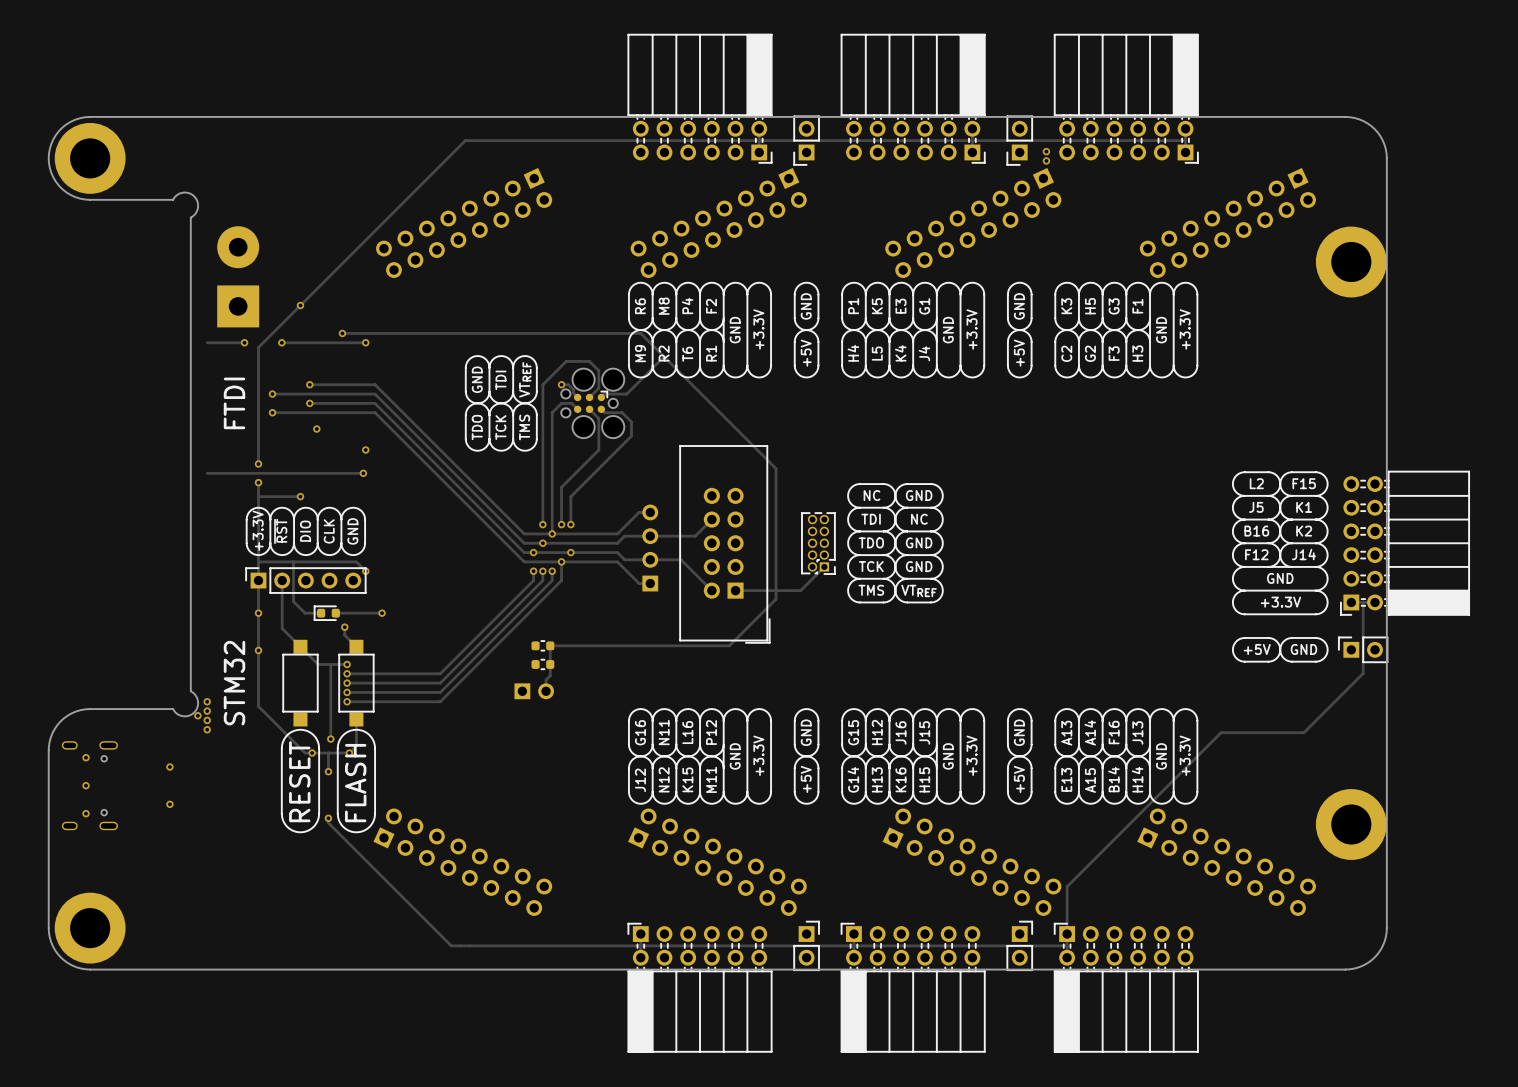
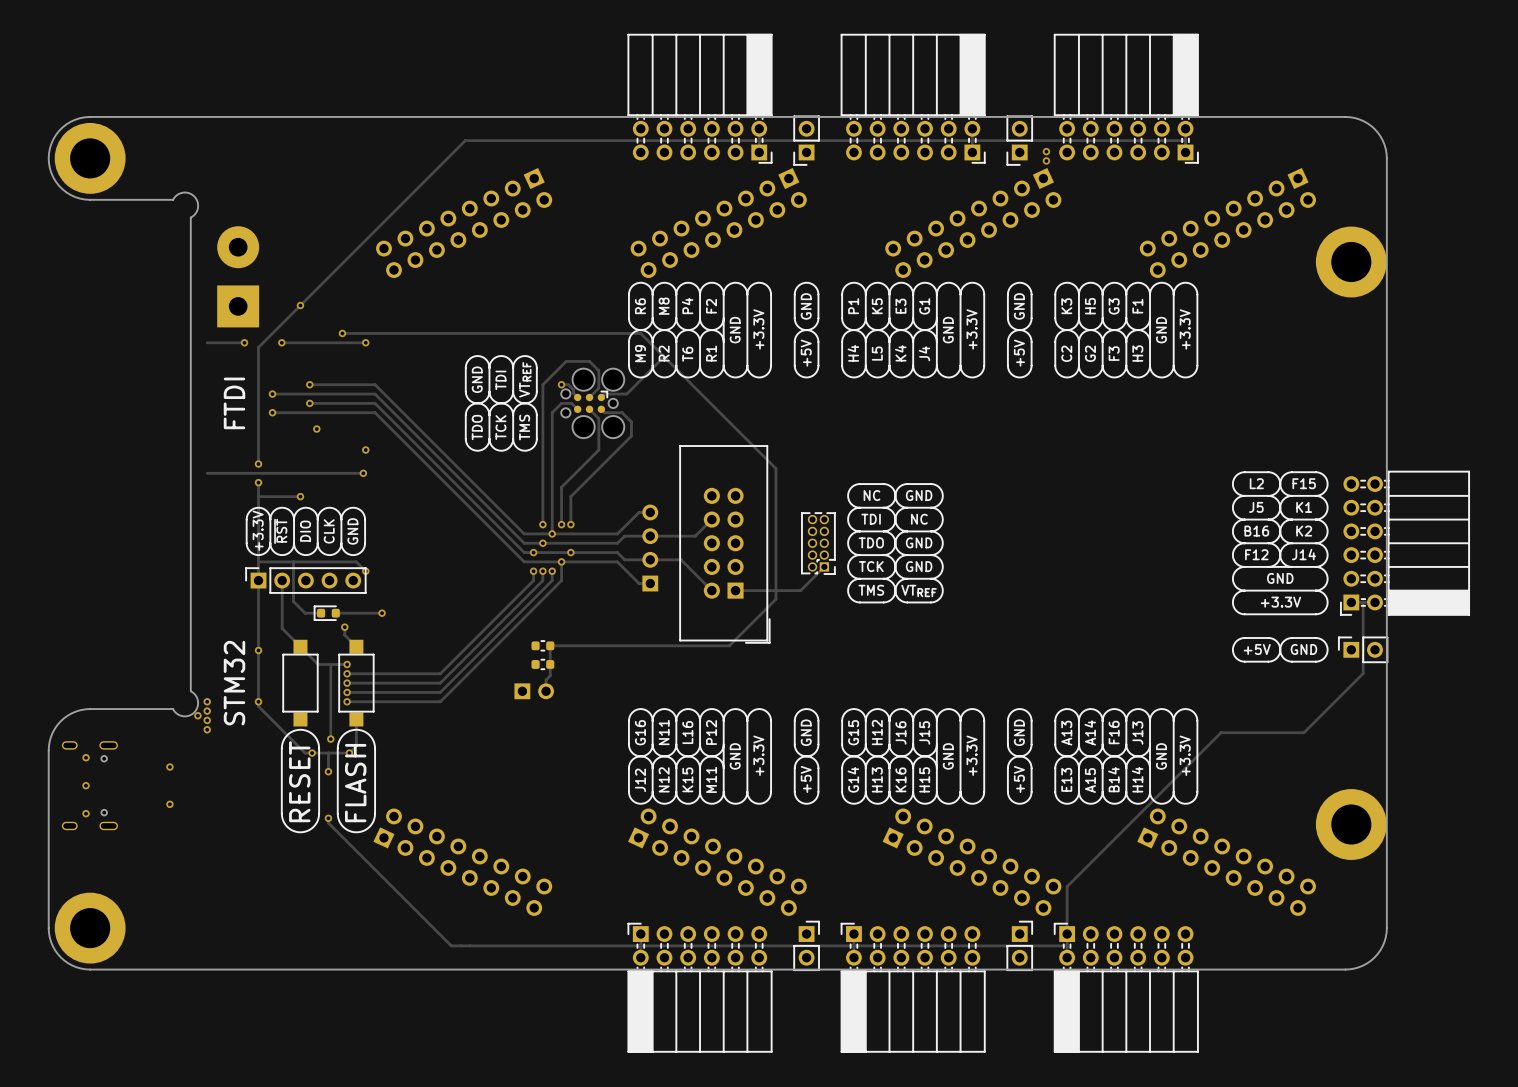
via: (258, 613) -> none
via: none -> (258, 701)

